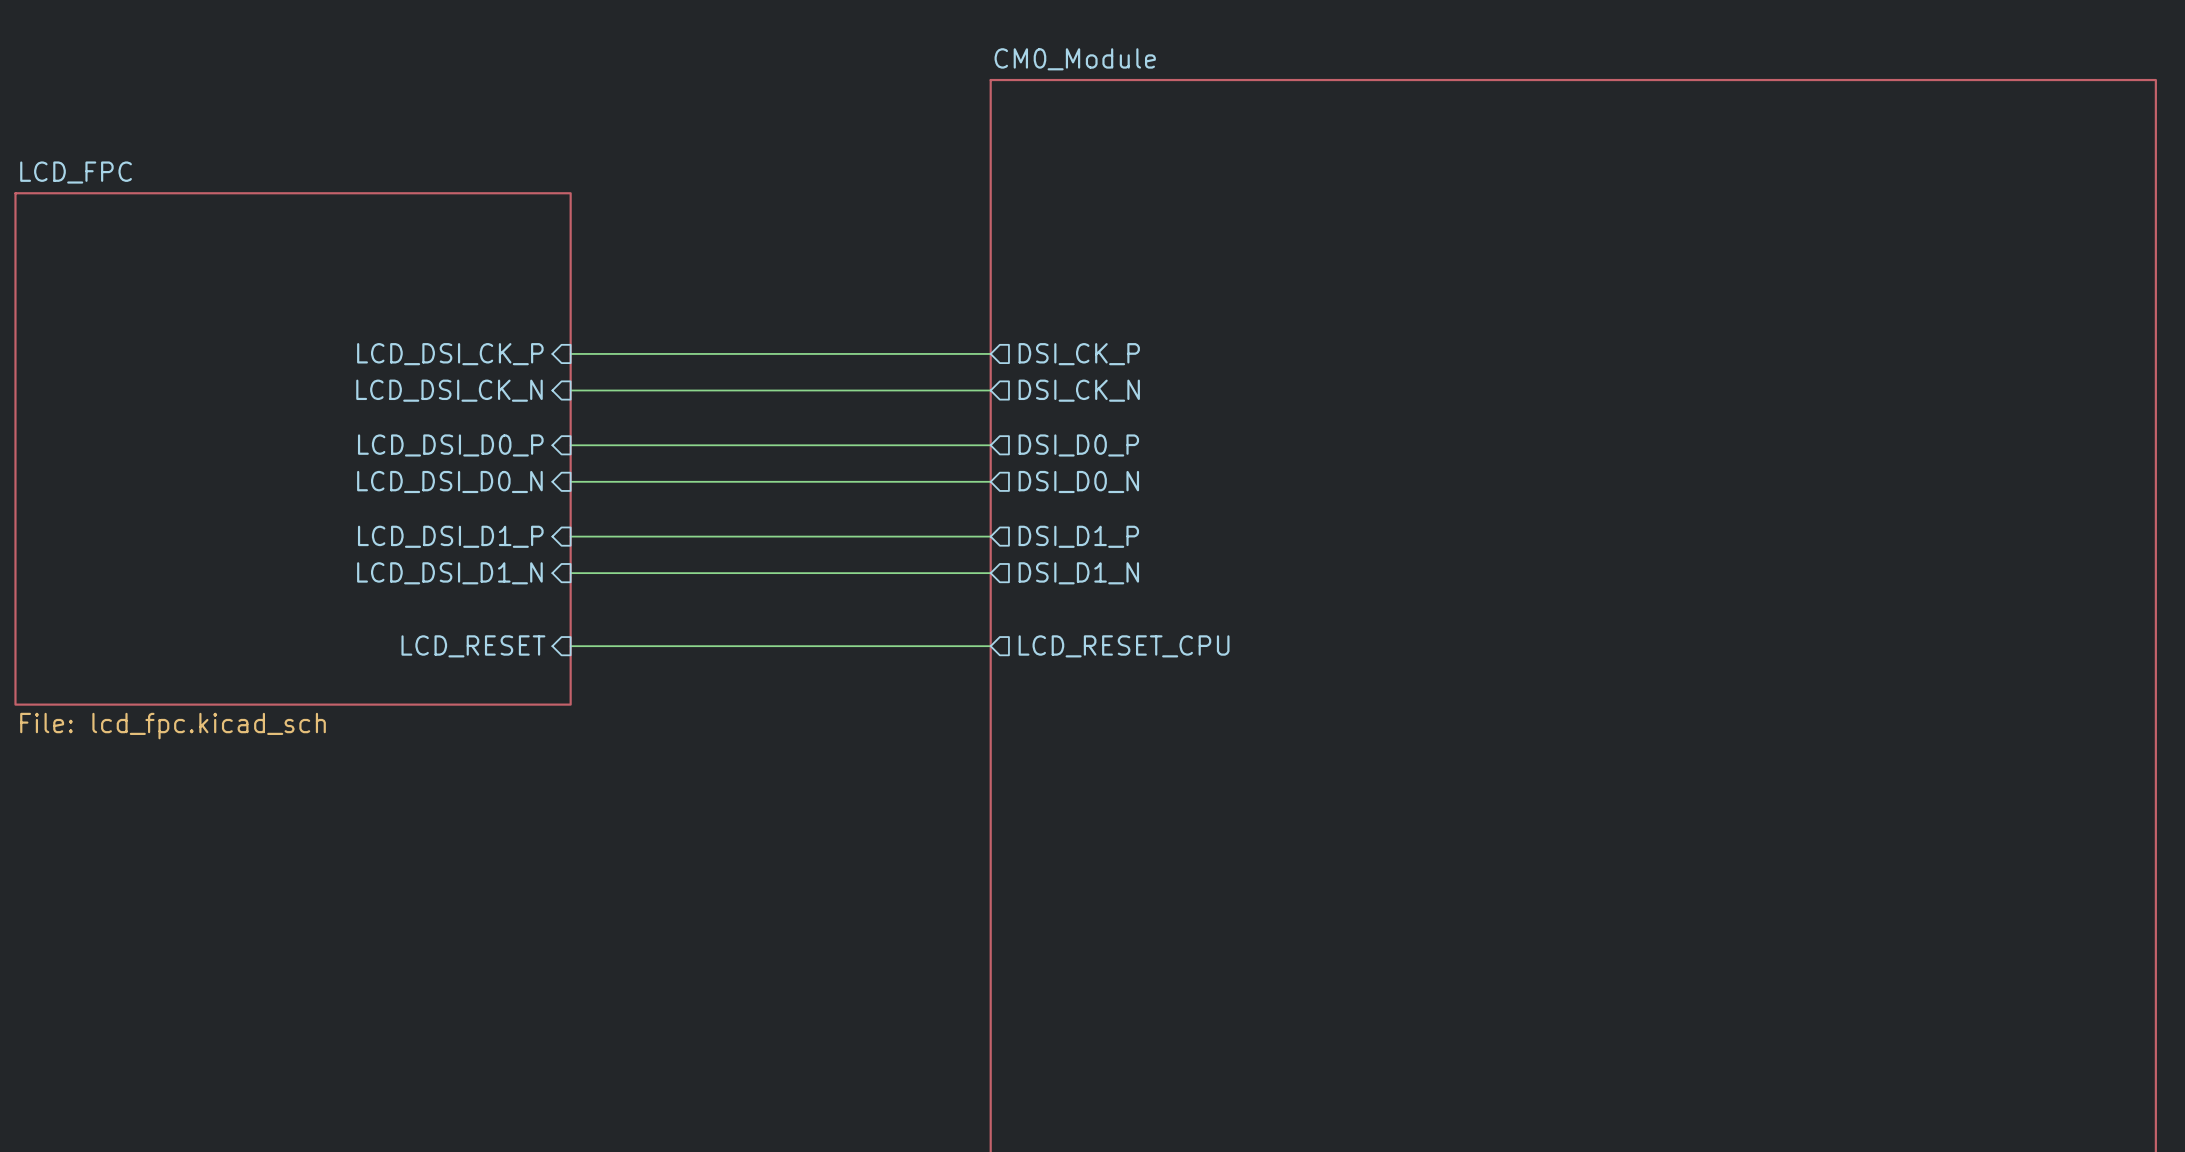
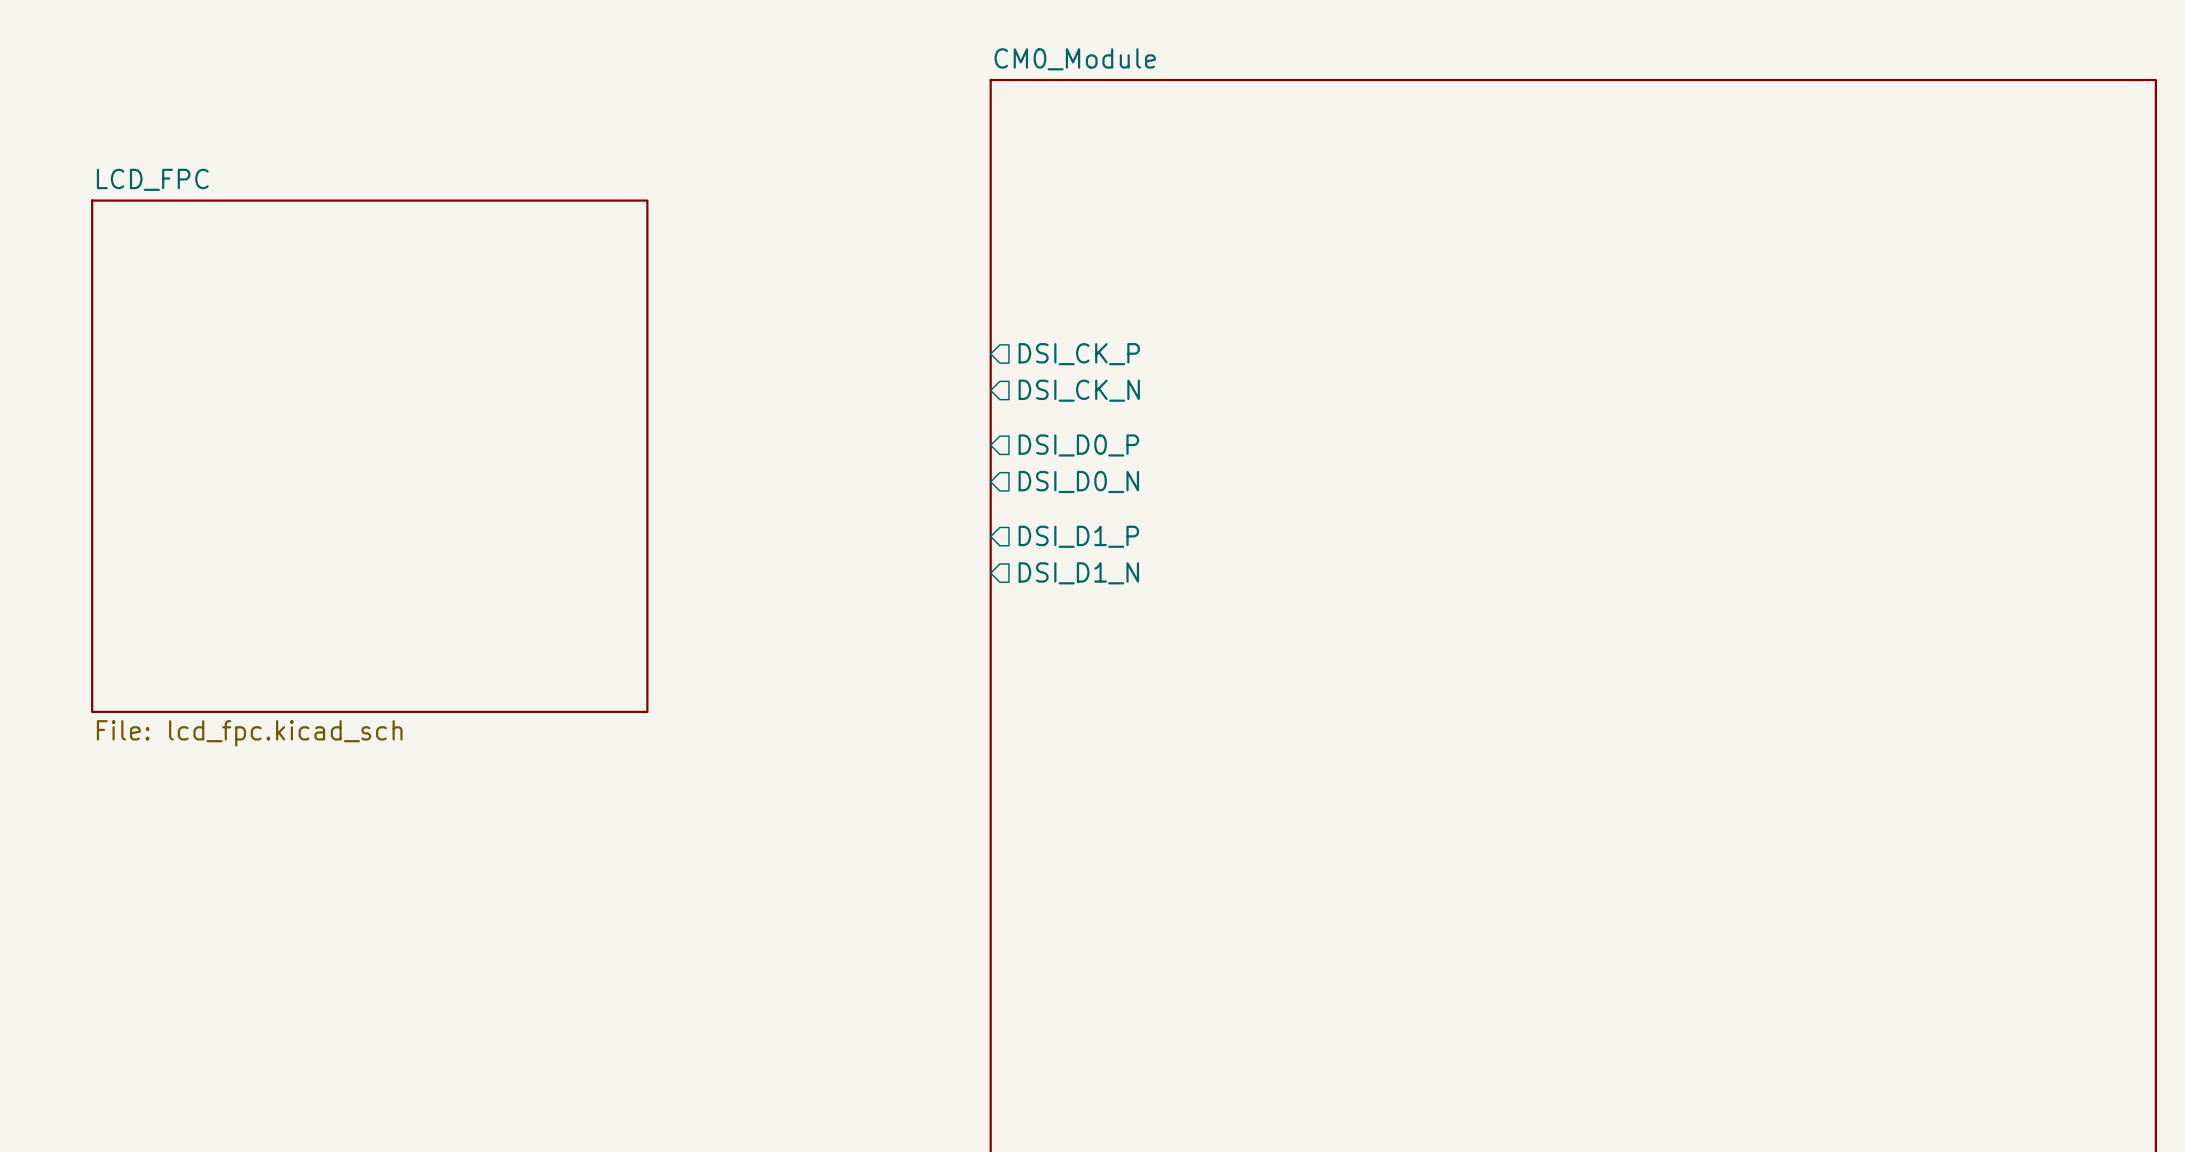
wire: (570, 353) (990, 353) -> none
sheet pin: LCD_DSI_CK_P (450, 354) -> none
sheet pin: LCD_DSI_CK_N (449, 390) -> none
wire: (570, 390) (990, 390) -> none
sheet pin: LCD_DSI_D0_P (450, 445) -> none
wire: (570, 445) (990, 445) -> none
sheet LCD_FPC position: (293, 448) -> (369, 456)
sheet pin: LCD_DSI_D0_N (449, 481) -> none
wire: (570, 481) (990, 481) -> none
sheet pin: LCD_DSI_D1_P (450, 536) -> none
wire: (570, 536) (990, 536) -> none
sheet pin: LCD_DSI_D1_N (449, 573) -> none
wire: (570, 573) (990, 573) -> none
sheet pin: LCD_RESET (473, 646) -> none
wire: (570, 646) (990, 646) -> none
sheet pin: LCD_RESET_CPU (1124, 646) -> none

